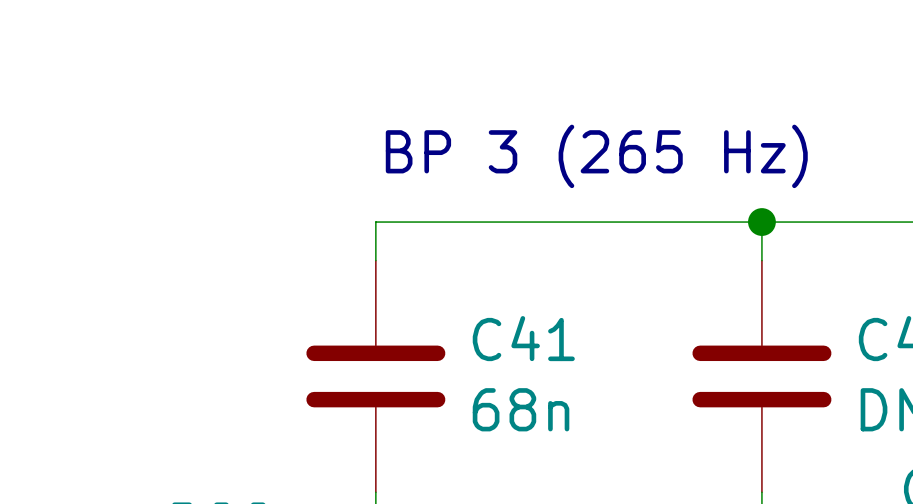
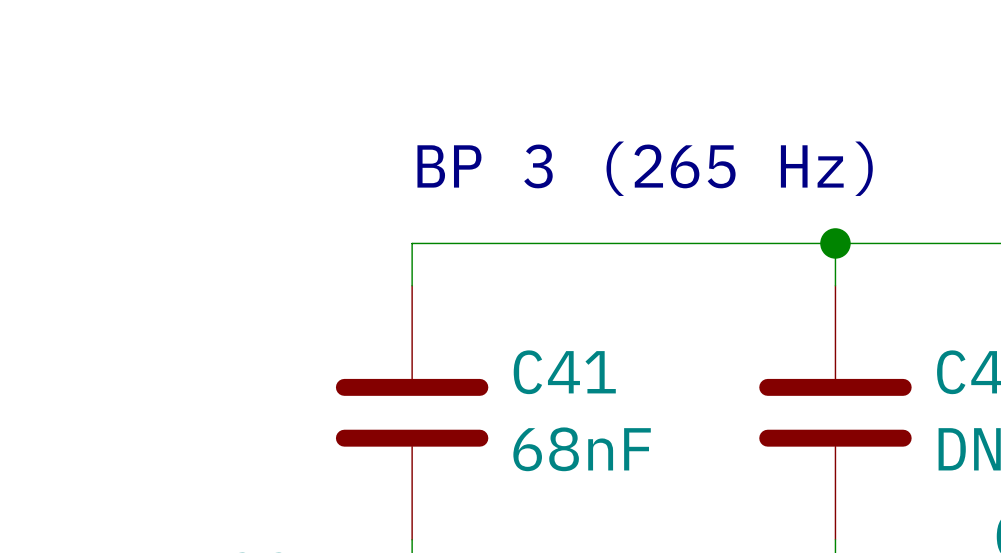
C41 value: 68n (521, 409) -> 68nF (582, 449)

